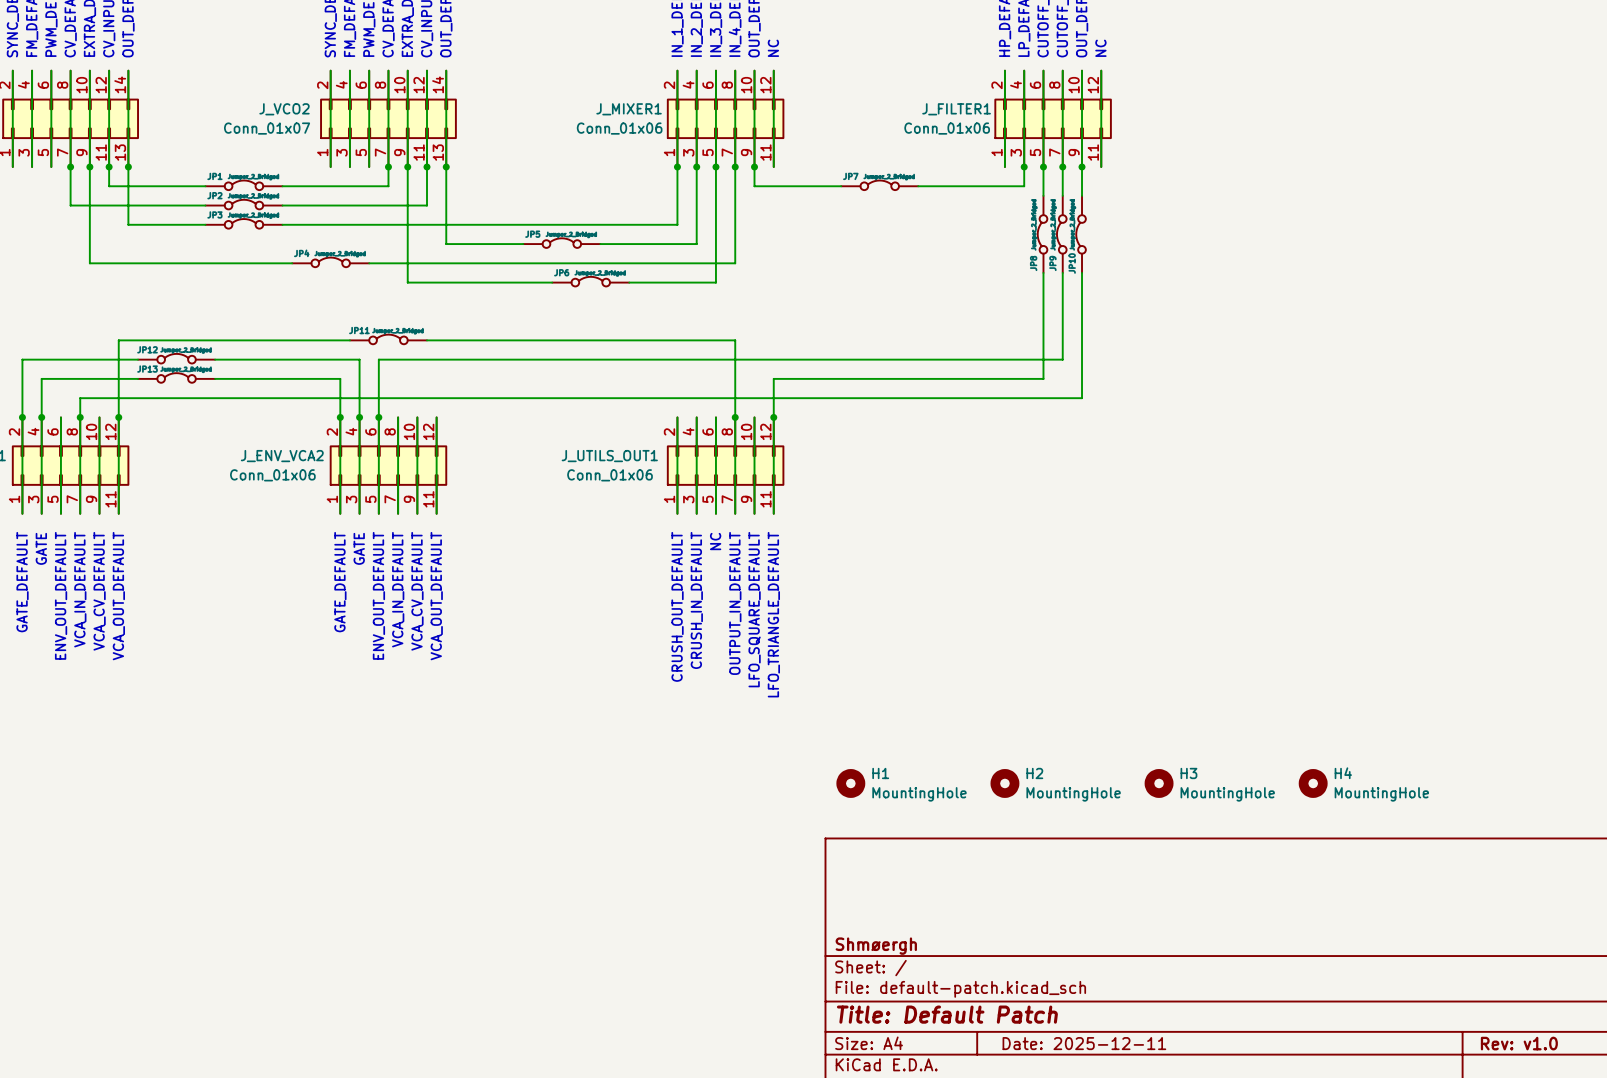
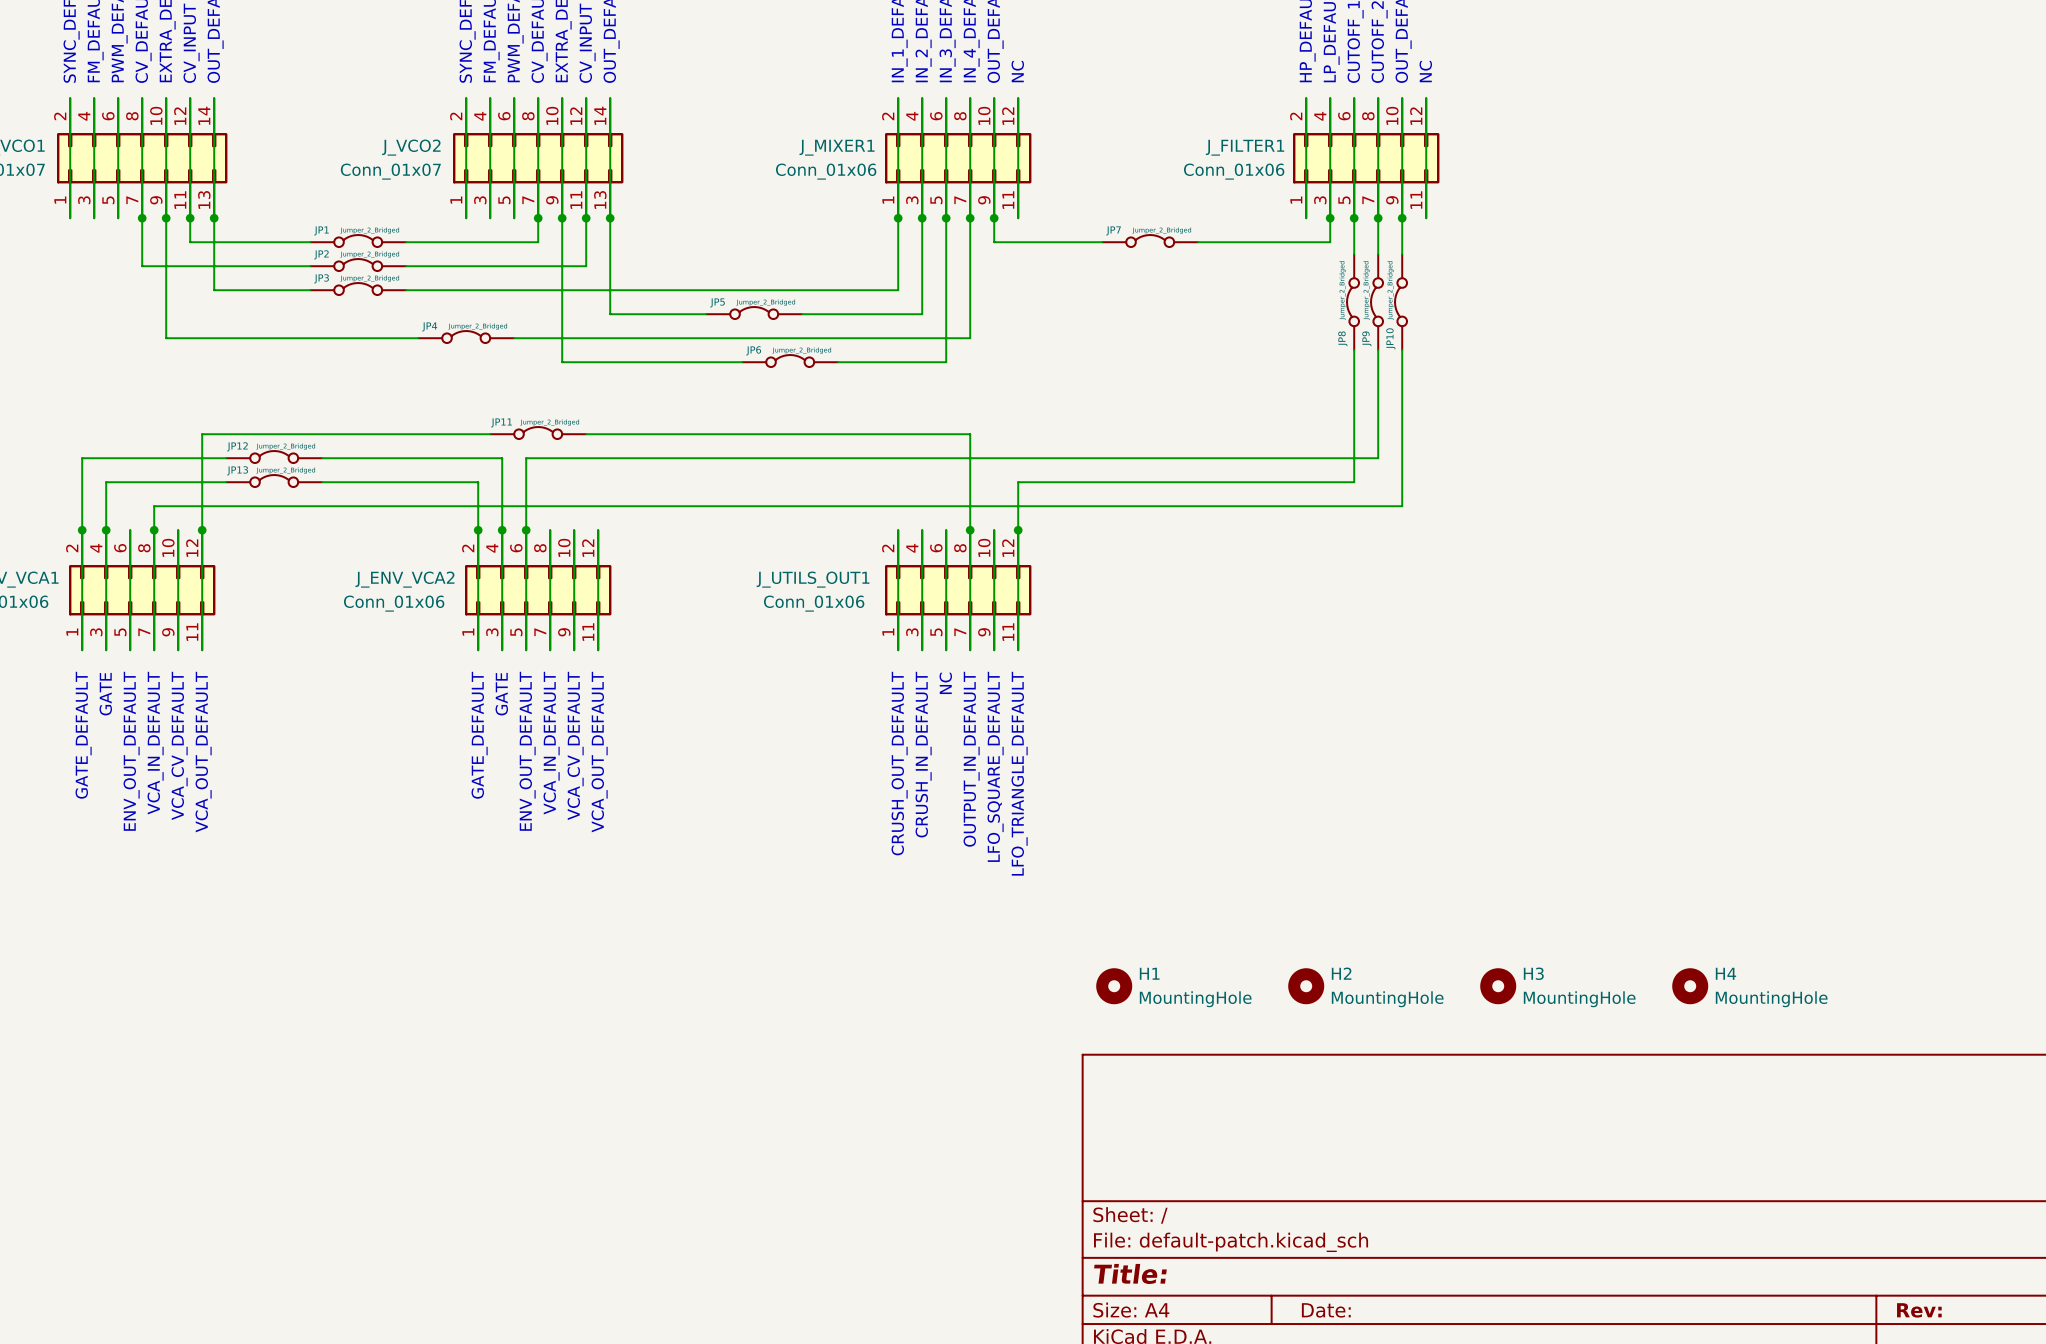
title block: Shmøergh (876, 946) -> none
title block: Title: Default Patch (947, 1014) -> Title: (1130, 1273)
title block: Date: 2025-12-11 (1084, 1043) -> Date: (1326, 1310)
title block: Rev: v1.0 (1519, 1043) -> Rev: (1919, 1310)

